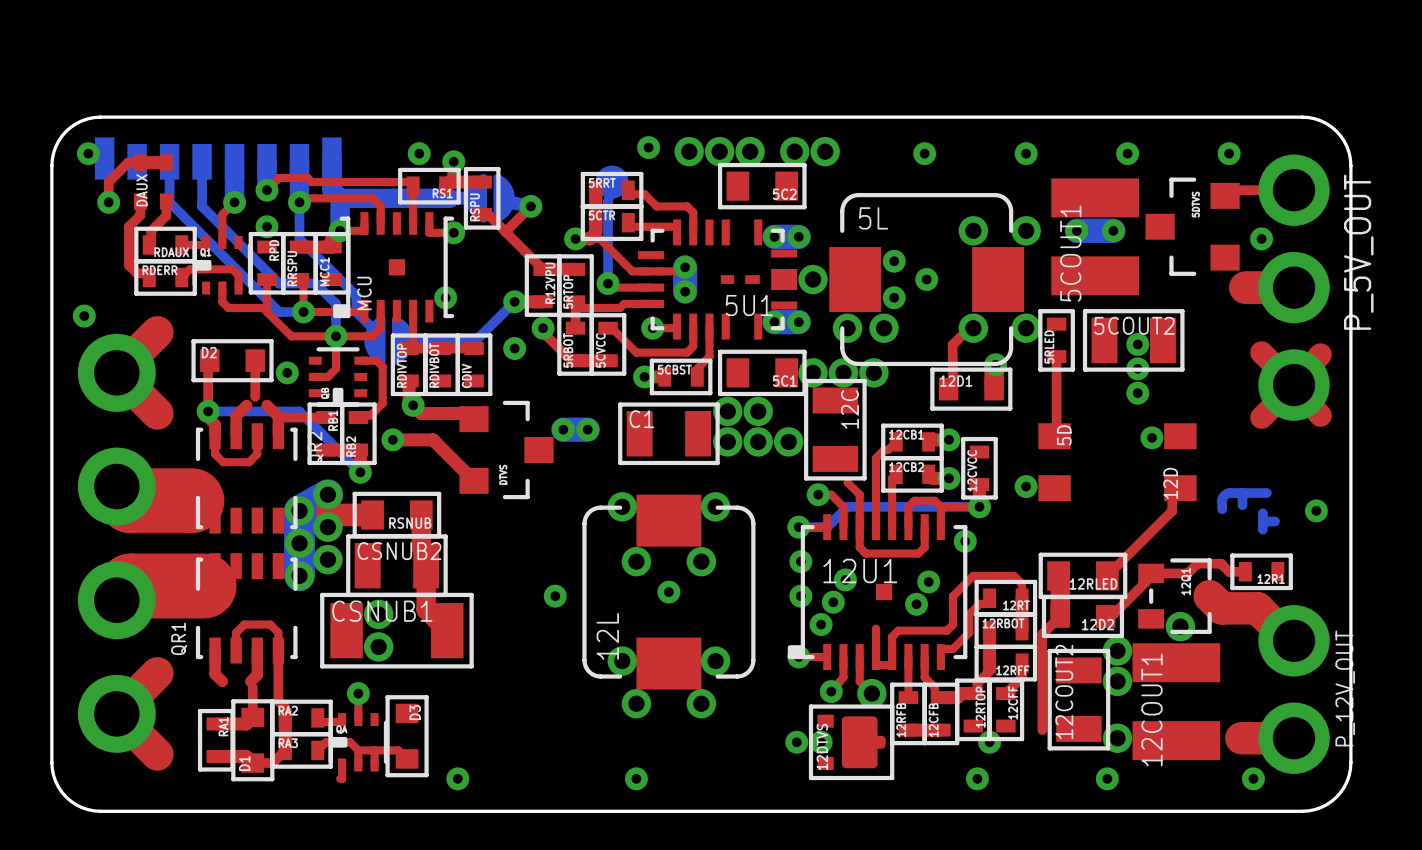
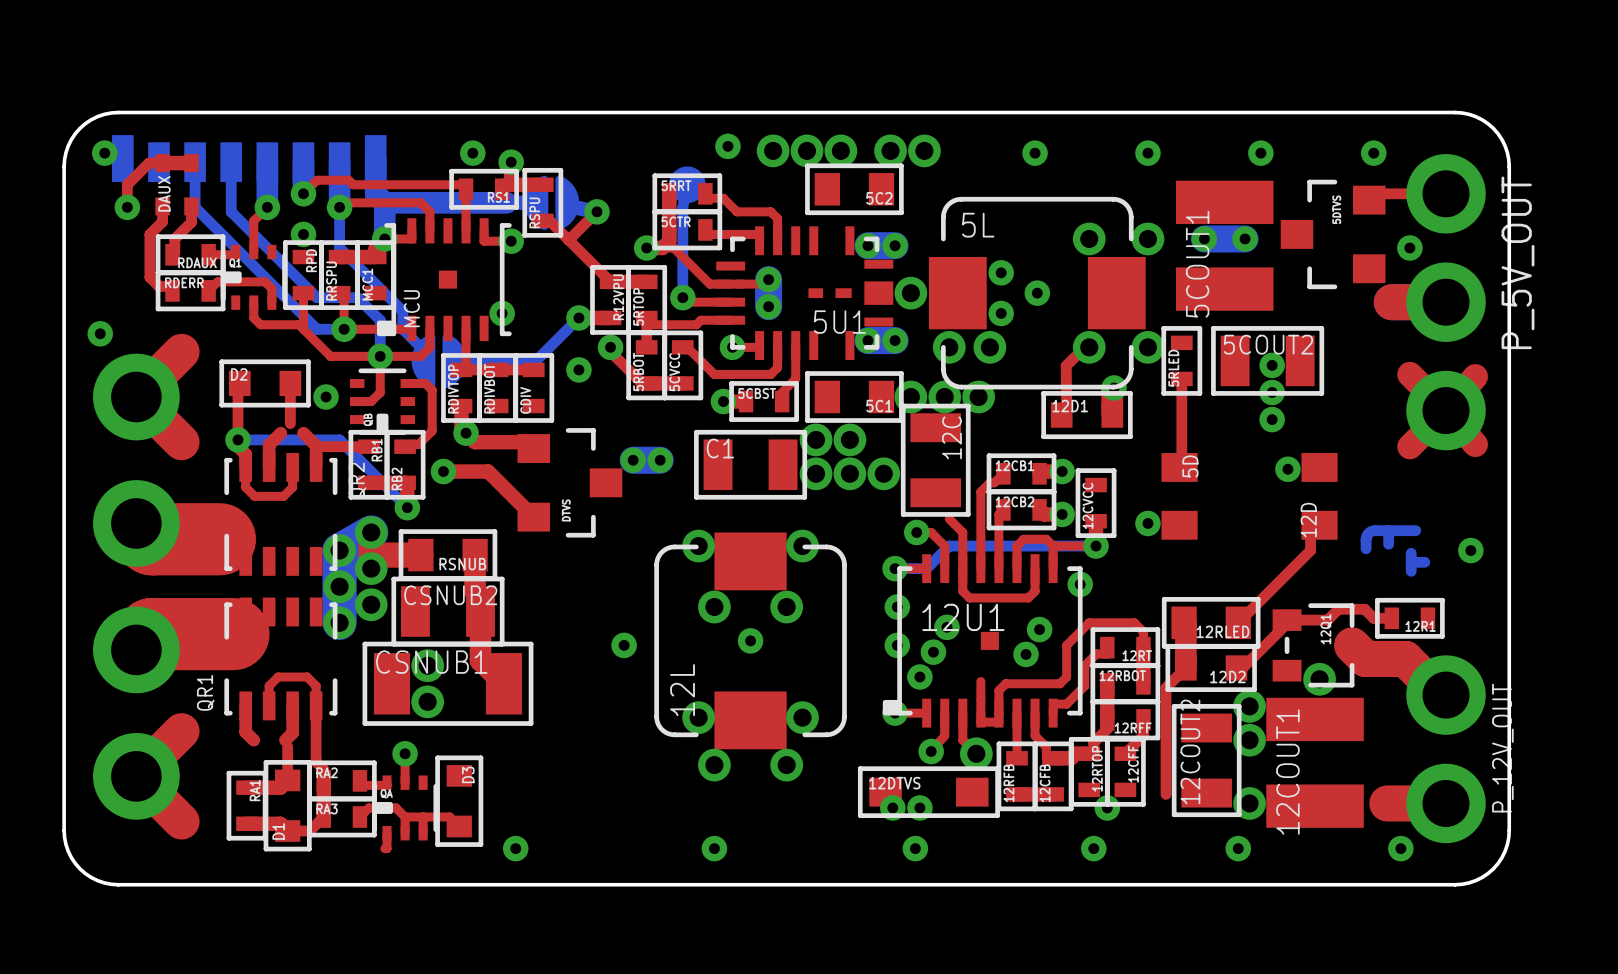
12DTVS footprint: [808, 704, 895, 781] -> [857, 766, 1000, 818]
via: none -> (915, 848)

